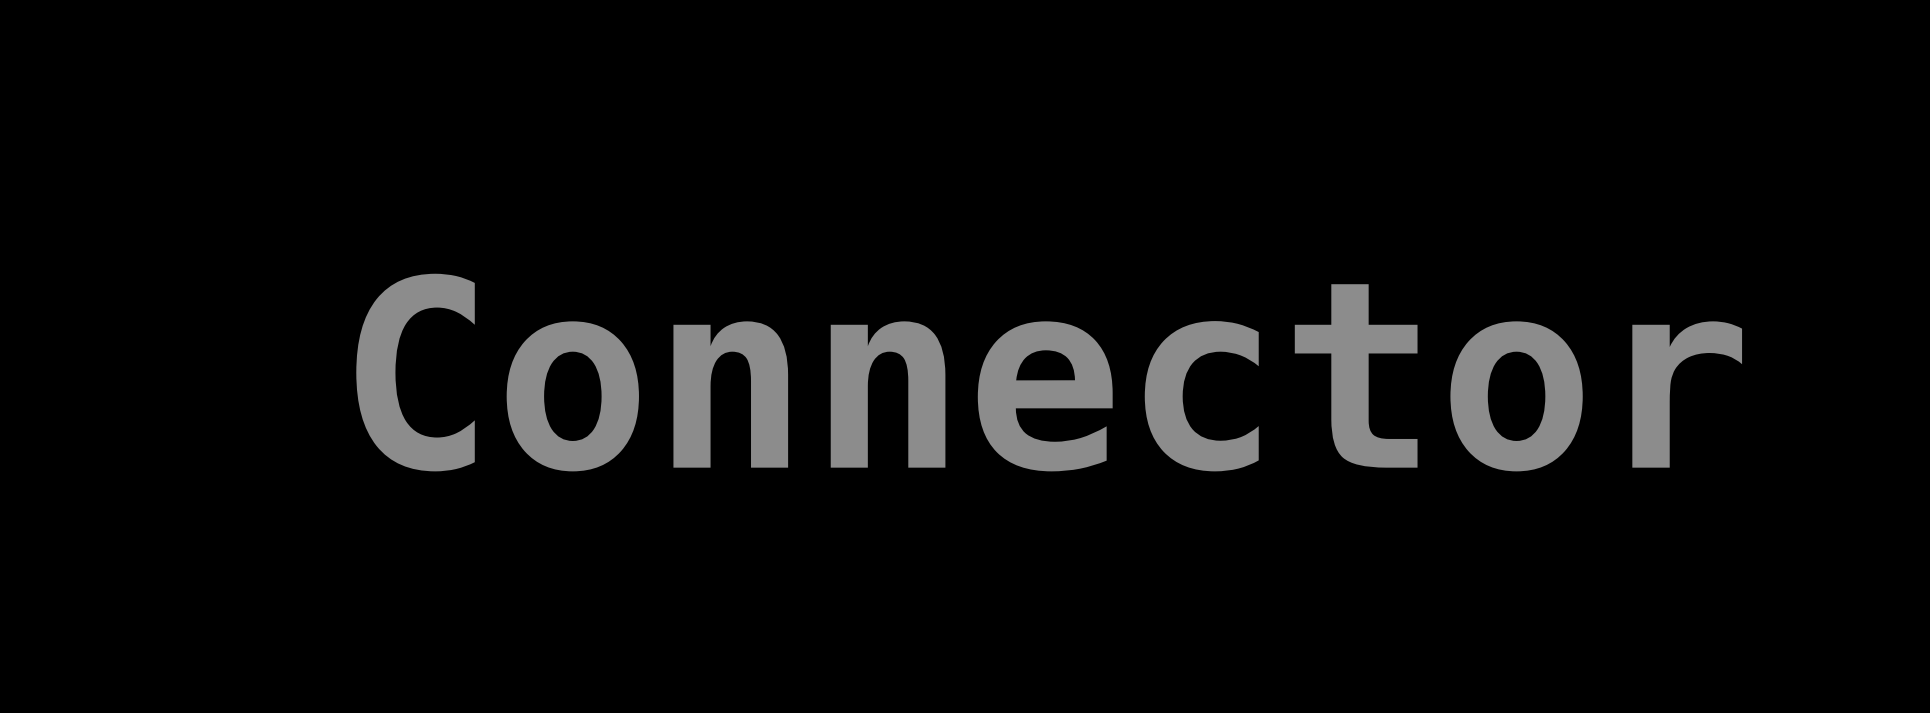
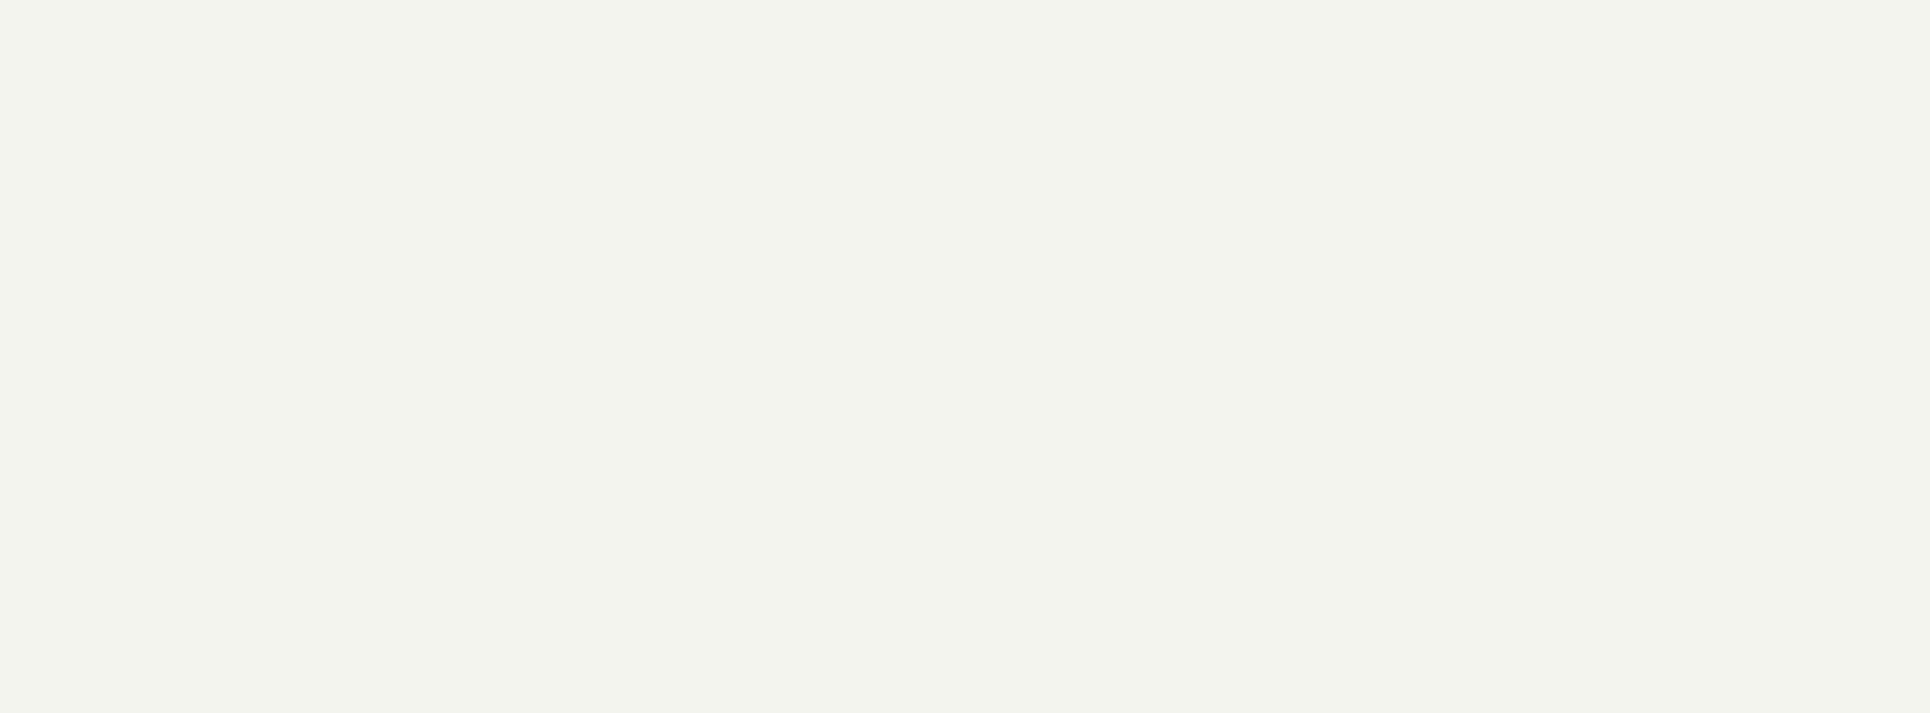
text: Connector (1049, 372) -> none

